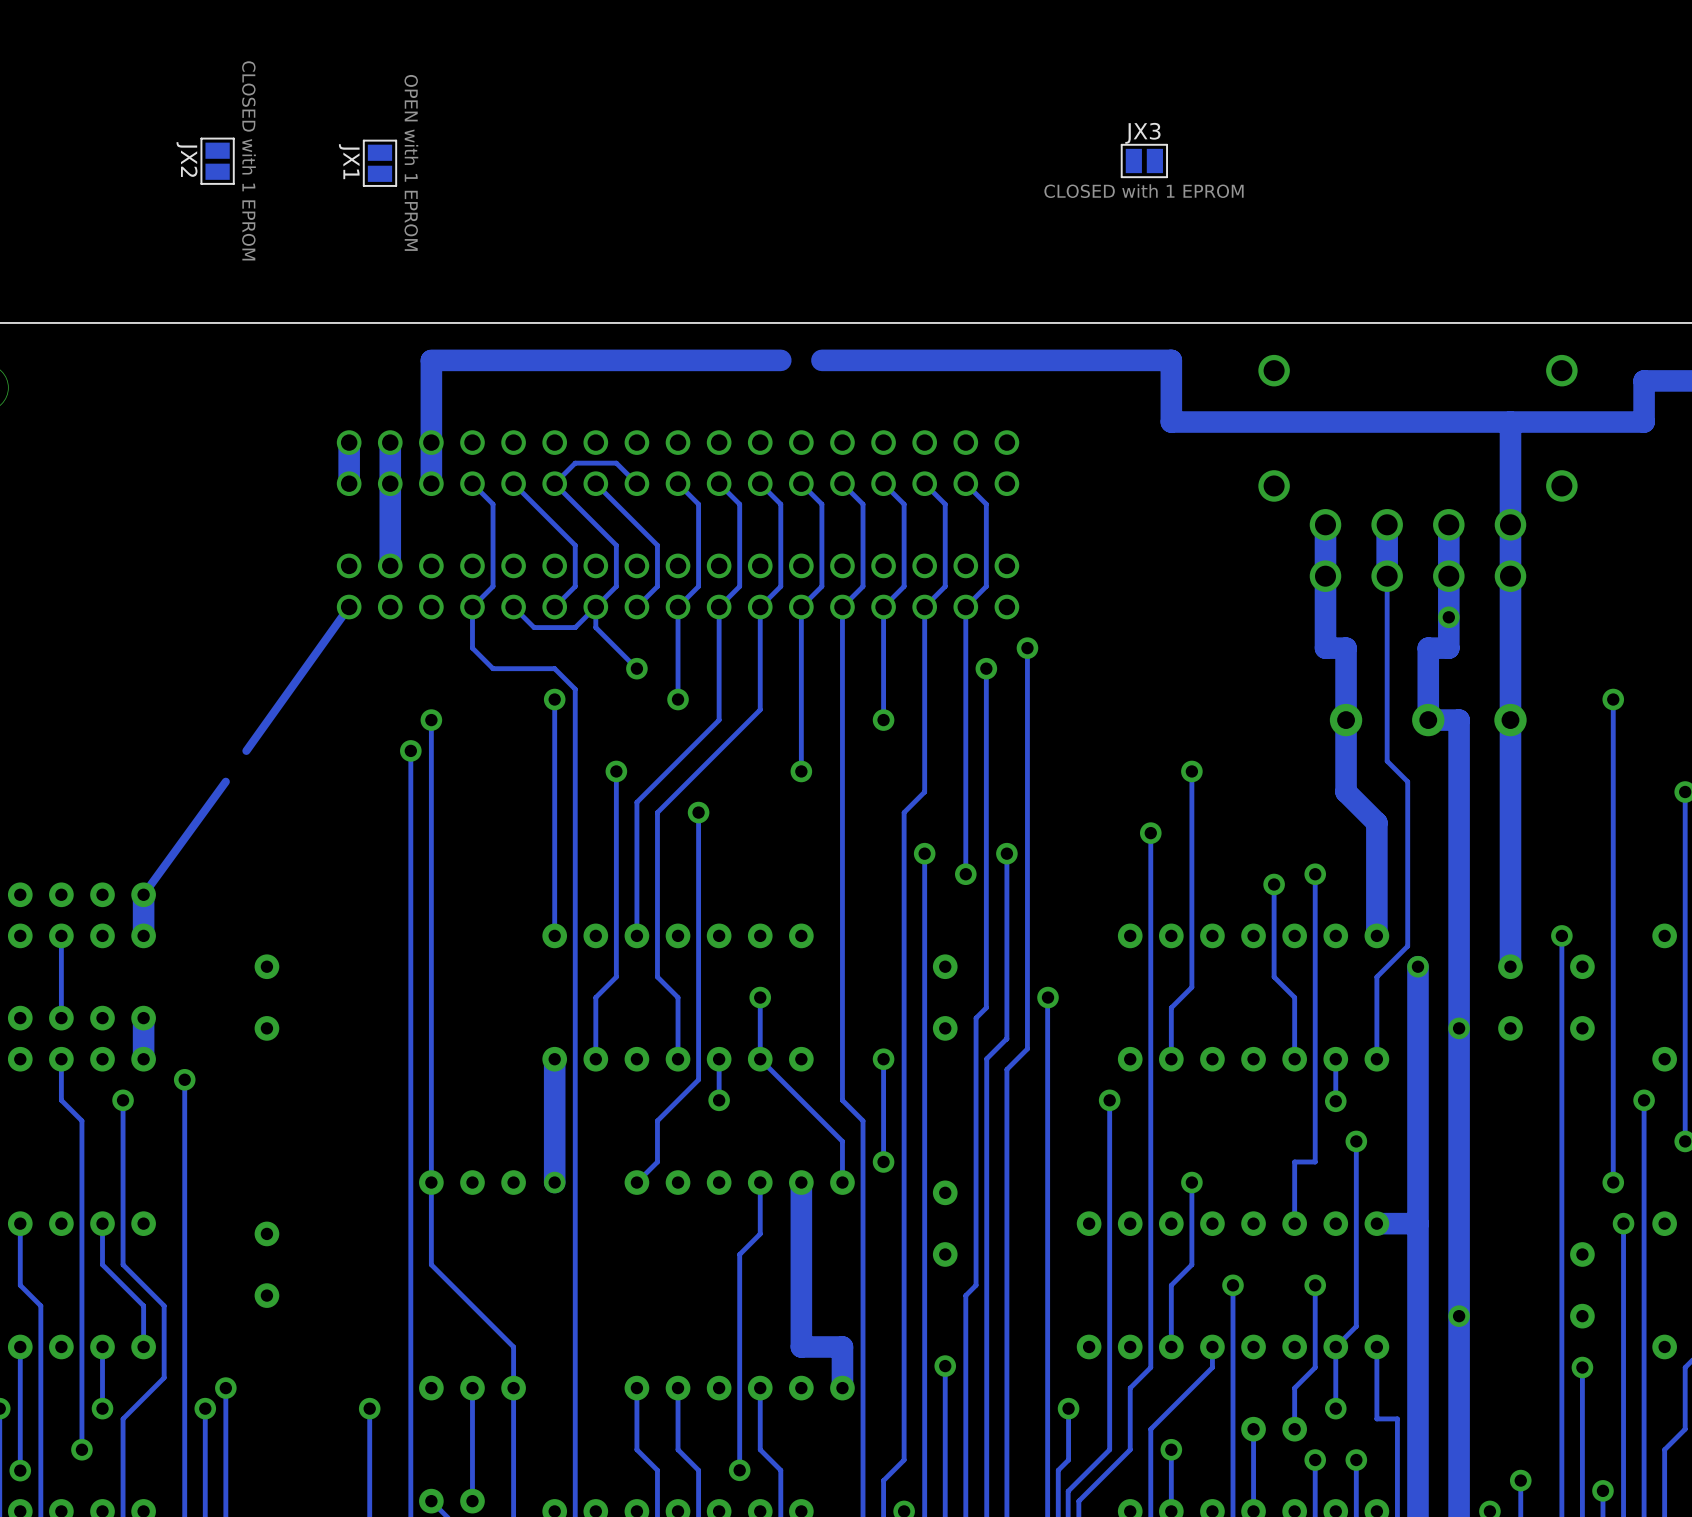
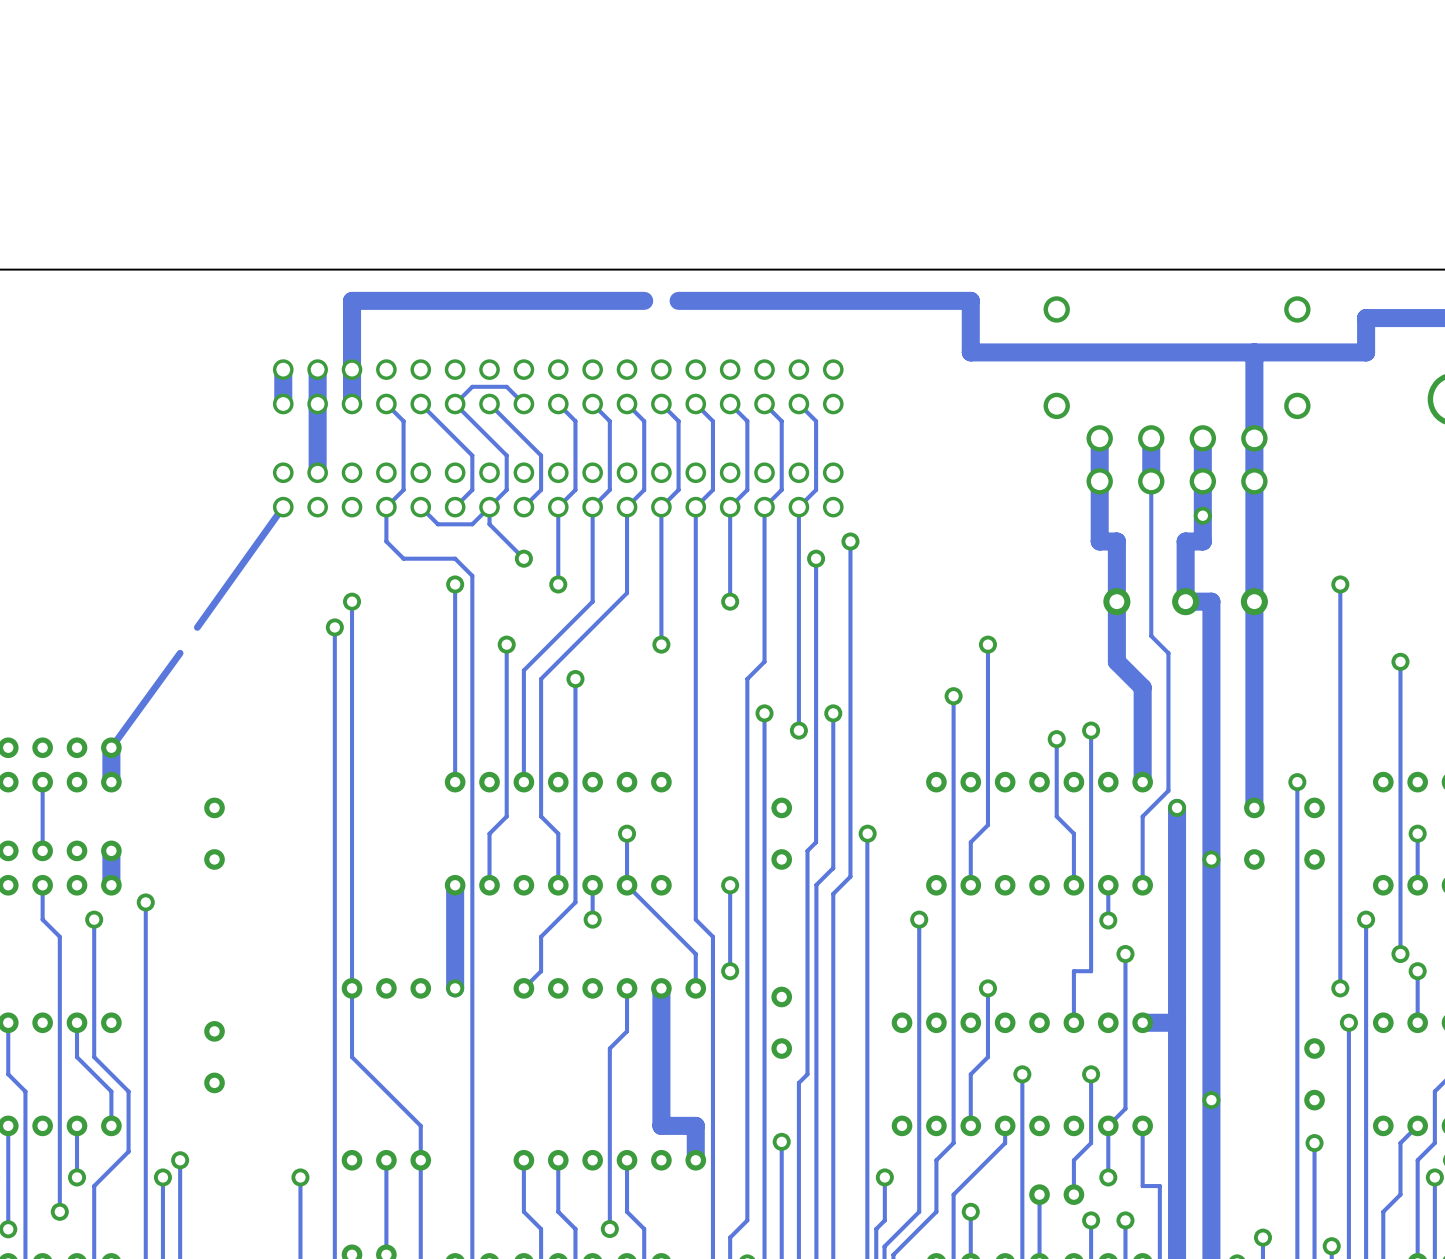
JX3: CLOSED with 1 EPROM (1144, 160) -> none
JX2: CLOSED with 1 EPROM (217, 161) -> none
JX1: OPEN with 1 EPROM (379, 163) -> none

